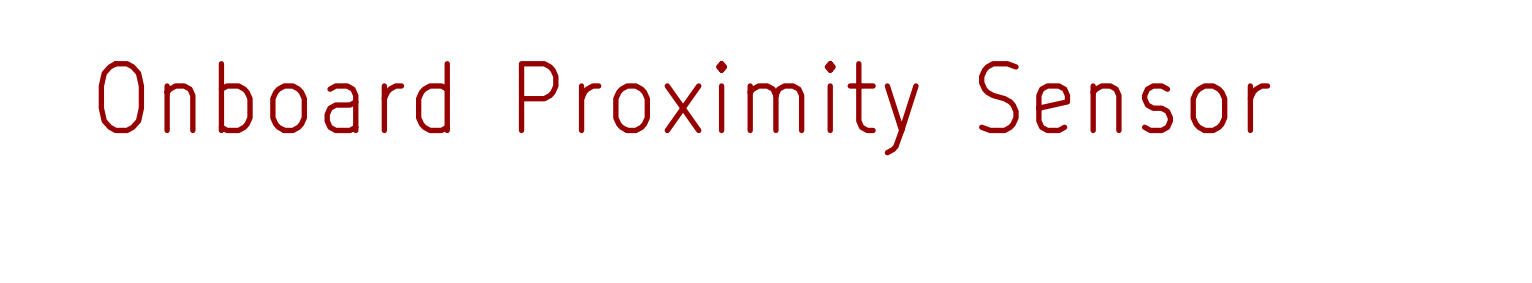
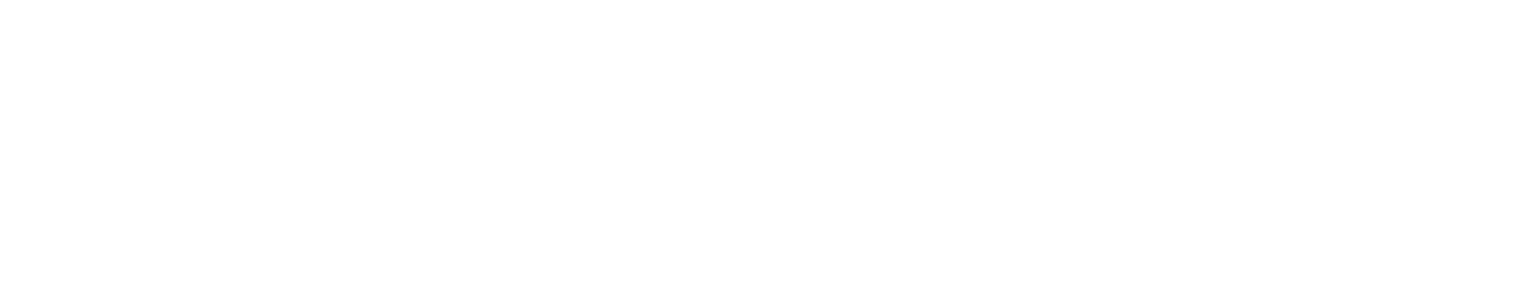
text: Onboard Proximity Sensor (684, 108) -> none

